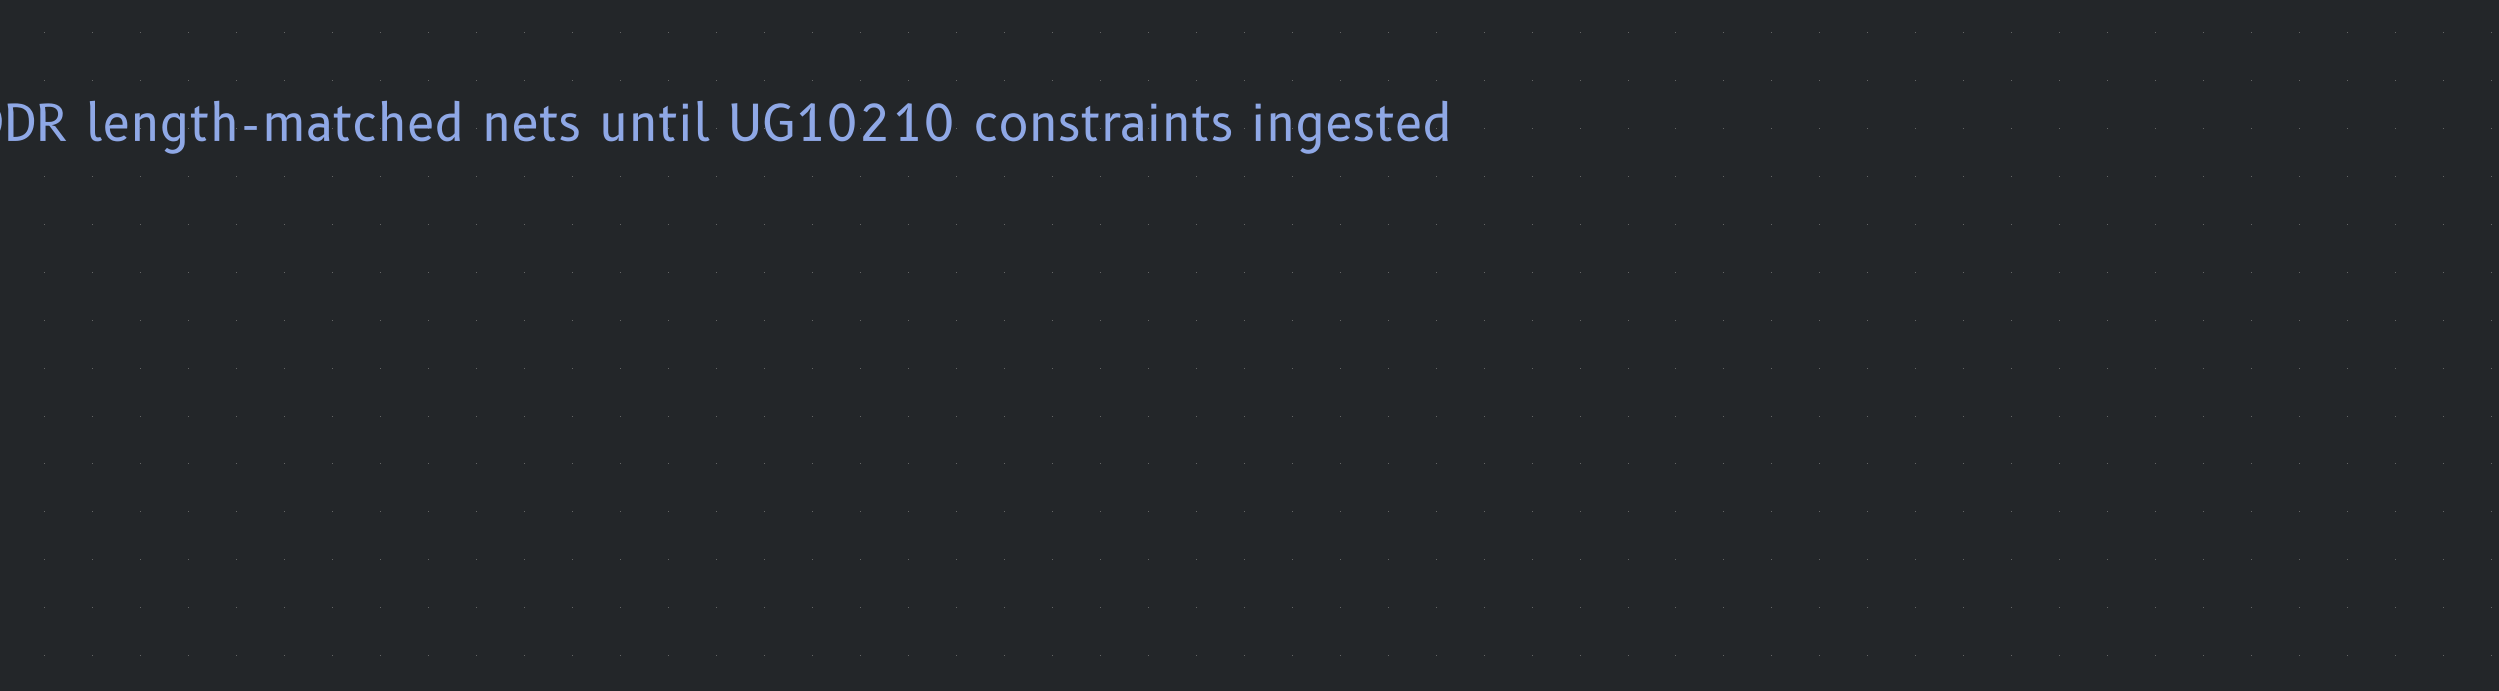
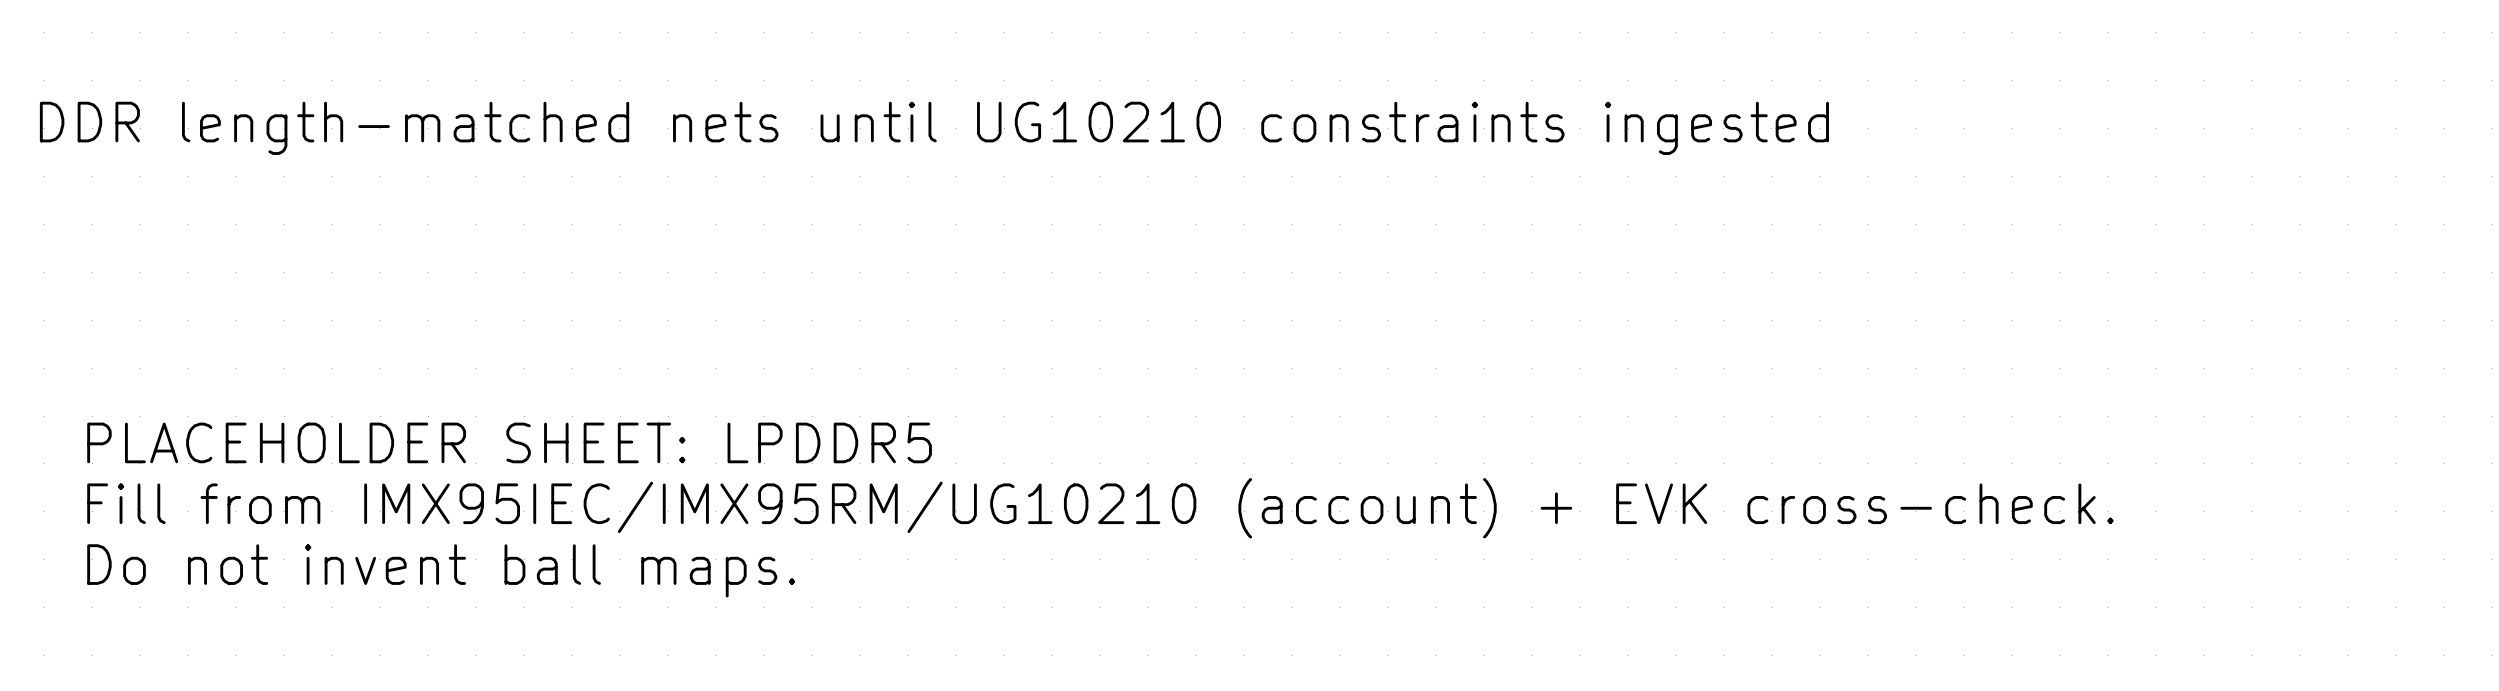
text: none -> PLACEHOLDER SHEET: LPDDR5 (509, 442)
text: none -> Fill from IMX95IEC/IMX95RM/UG10210 (account) + EVK cross-check. (1100, 508)
text: none -> Do not invent ball maps. (441, 570)

